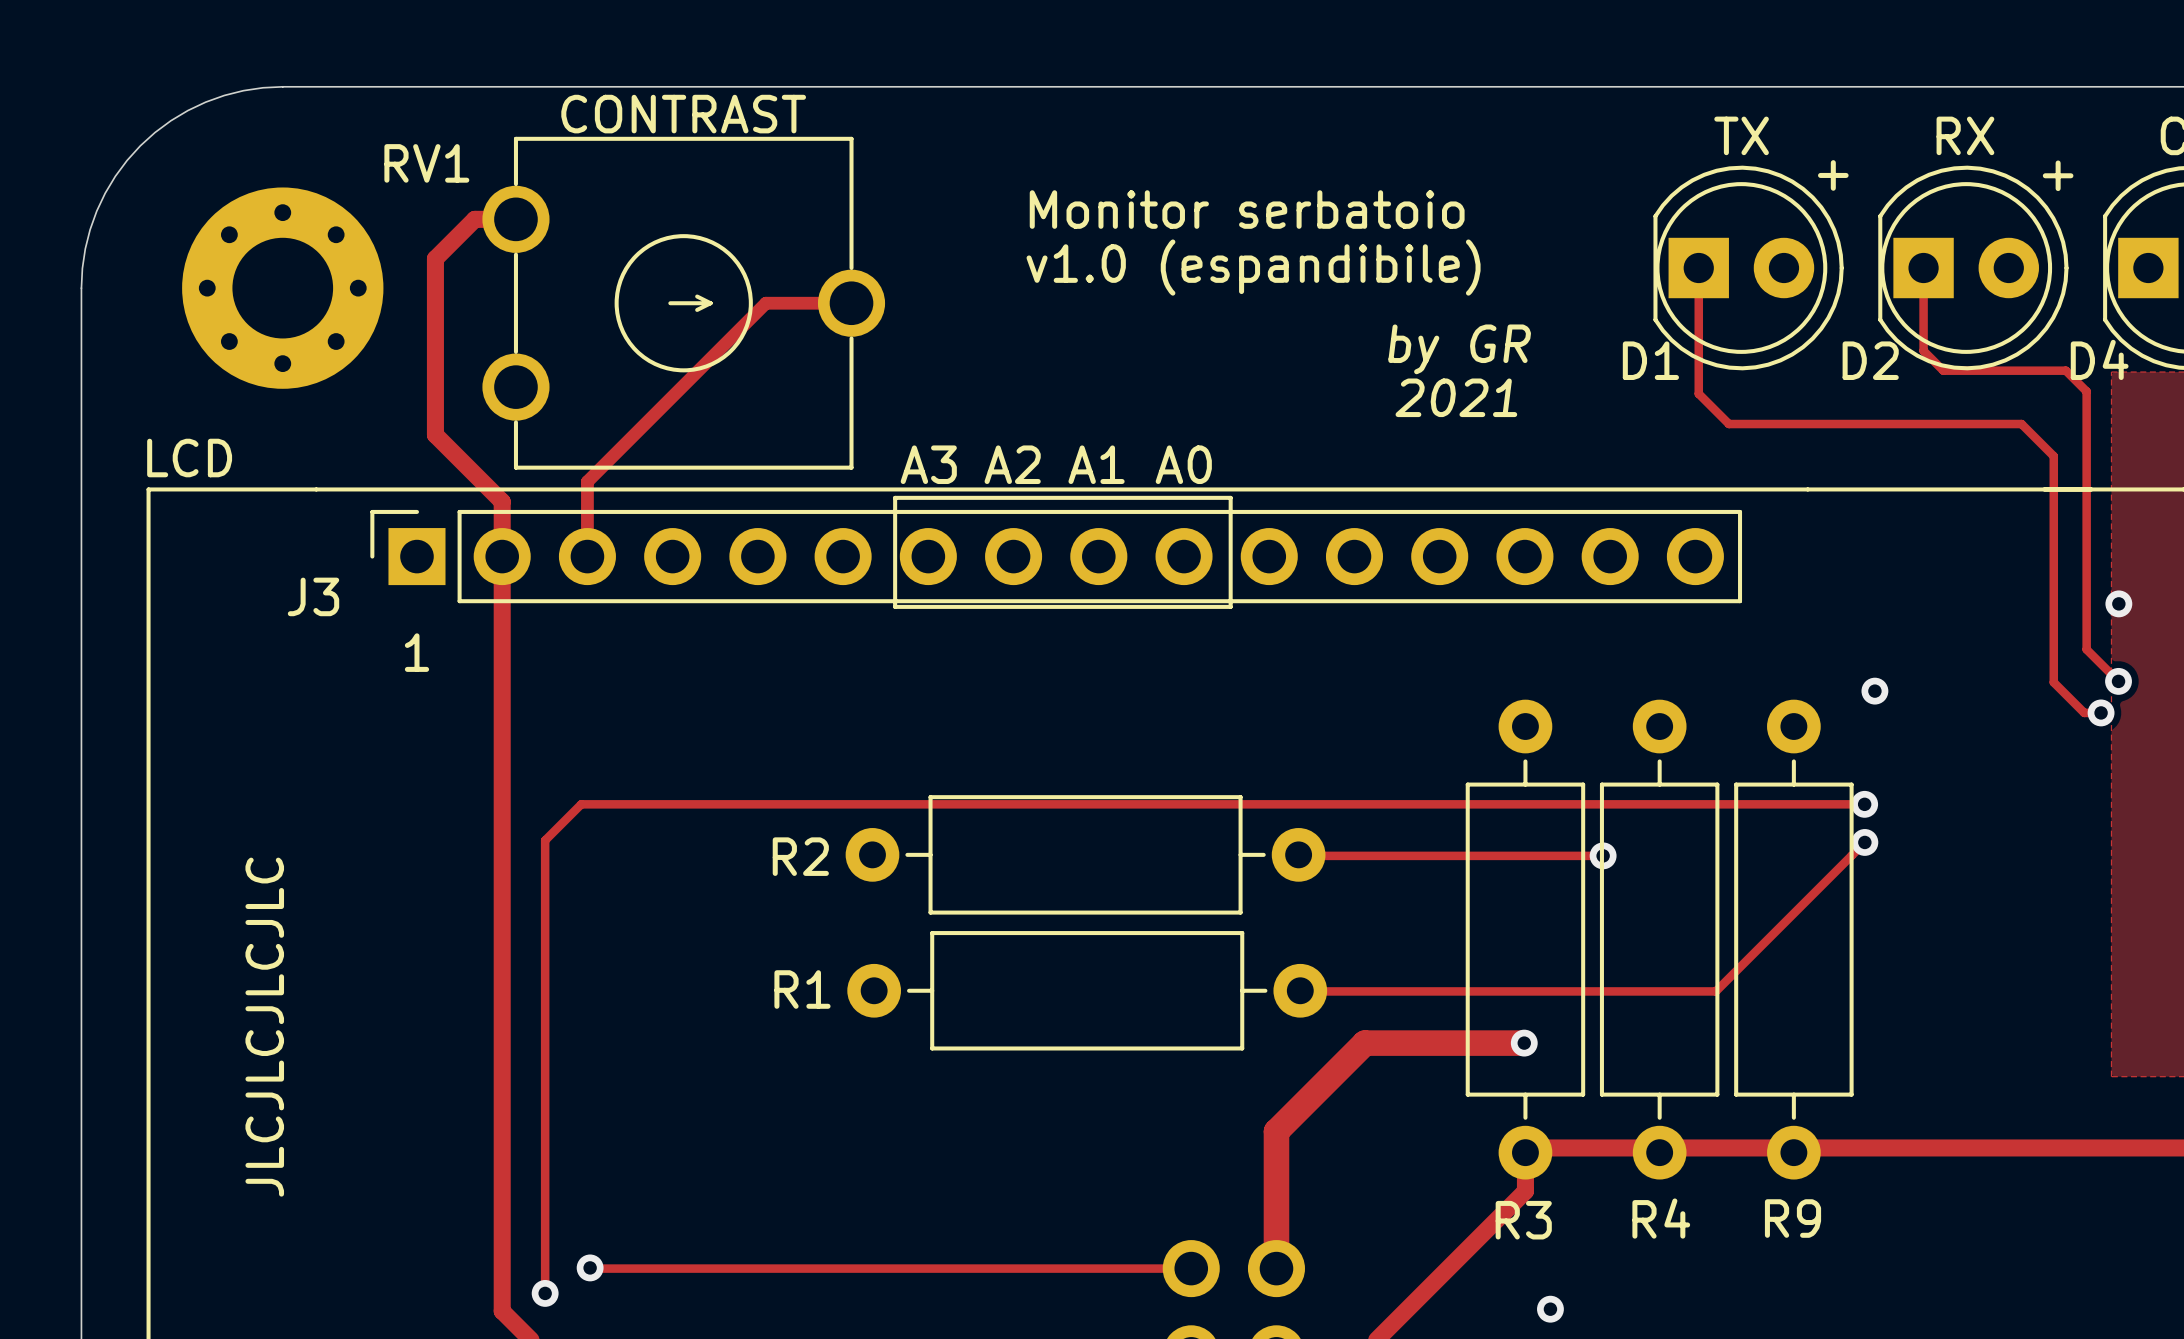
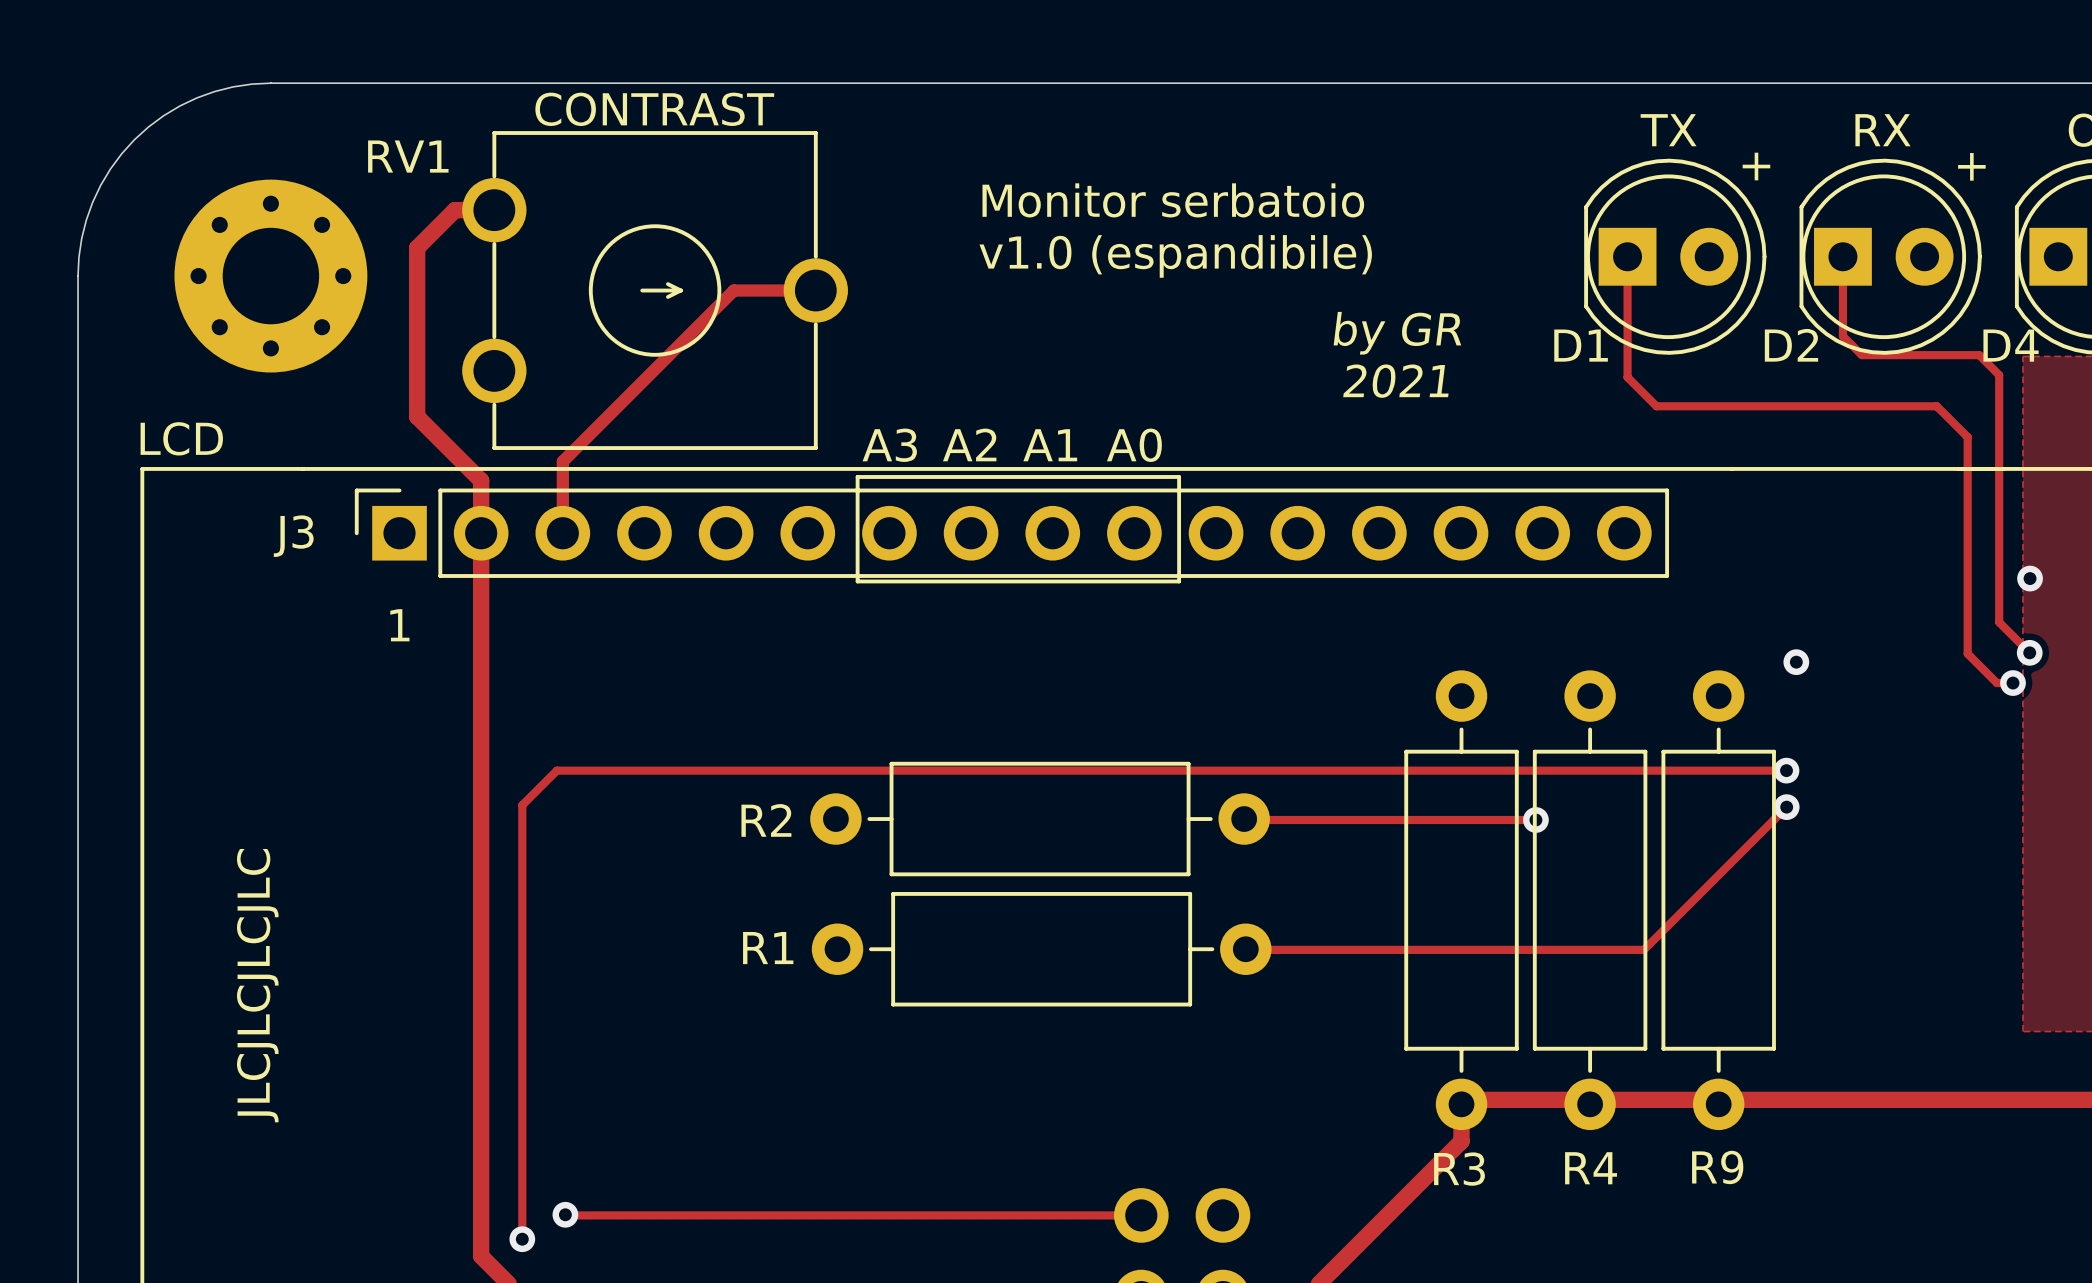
J3 name position: J3 (313, 596) -> J3 (293, 536)
track: (1524, 1043) (1364, 1043) (1276, 1131) (1276, 1268) -> none
via: (1524, 1043) -> none
via: (1550, 1309) -> none

